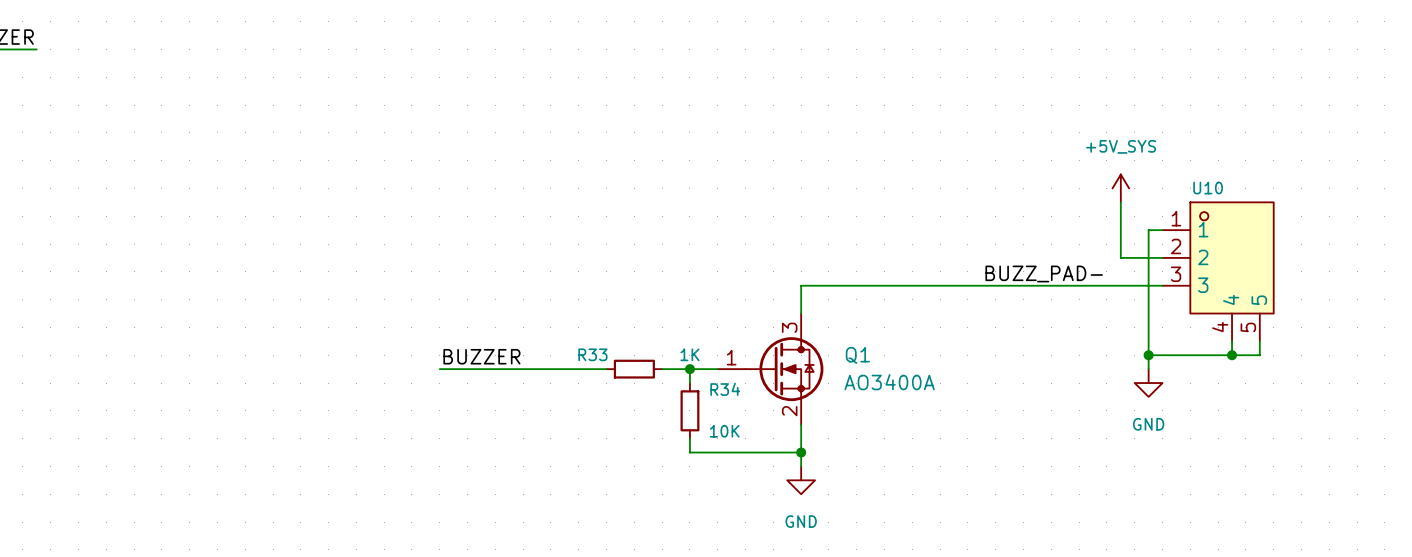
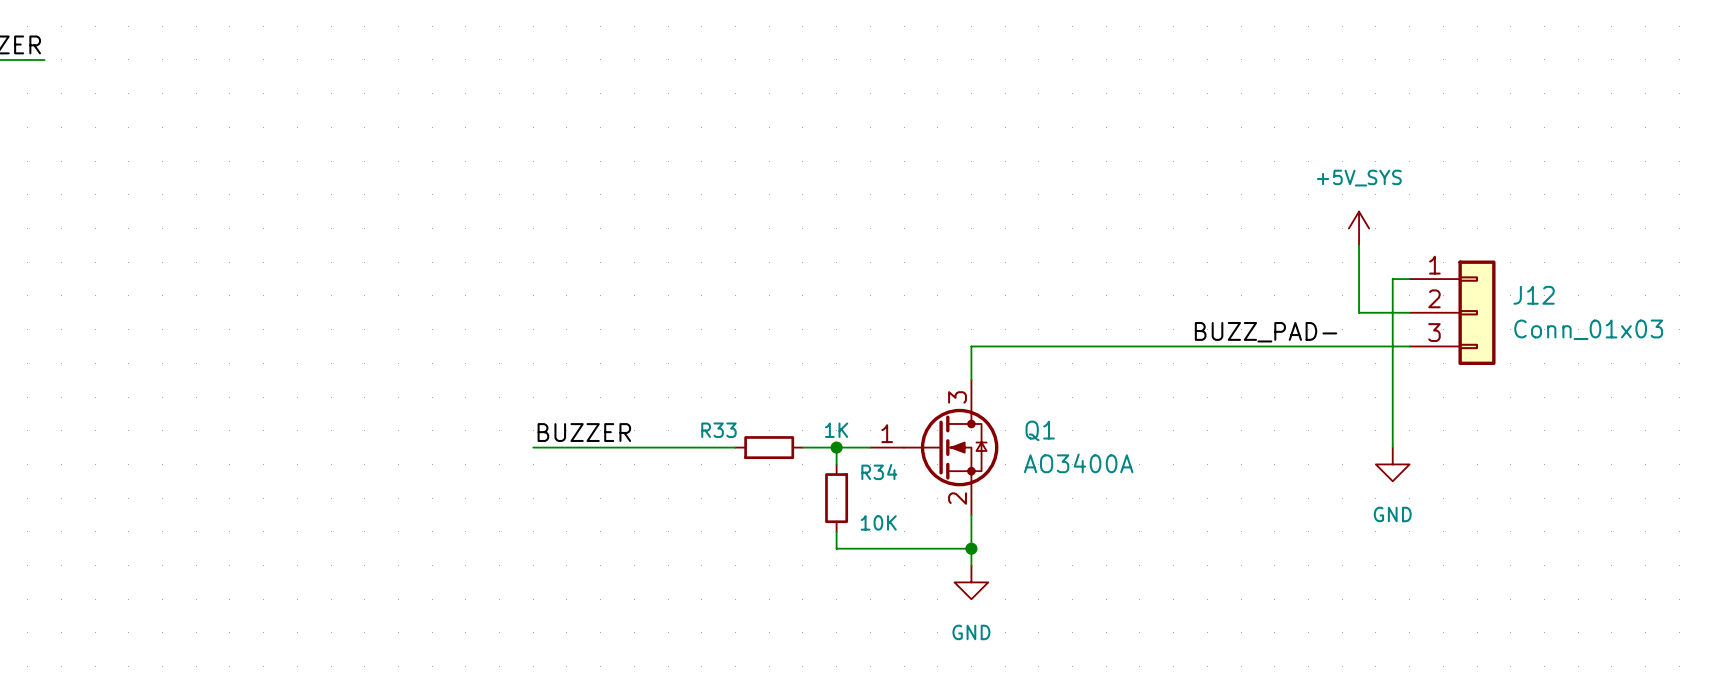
J12: none -> Conn_01x03 (1452, 312)
U10: (1218, 271) -> none
wire: (1232, 341) (1232, 355) -> none
wire: (1259, 341) (1259, 355) (1148, 355) -> none
junction: (1148, 355) -> none
junction: (1232, 355) -> none

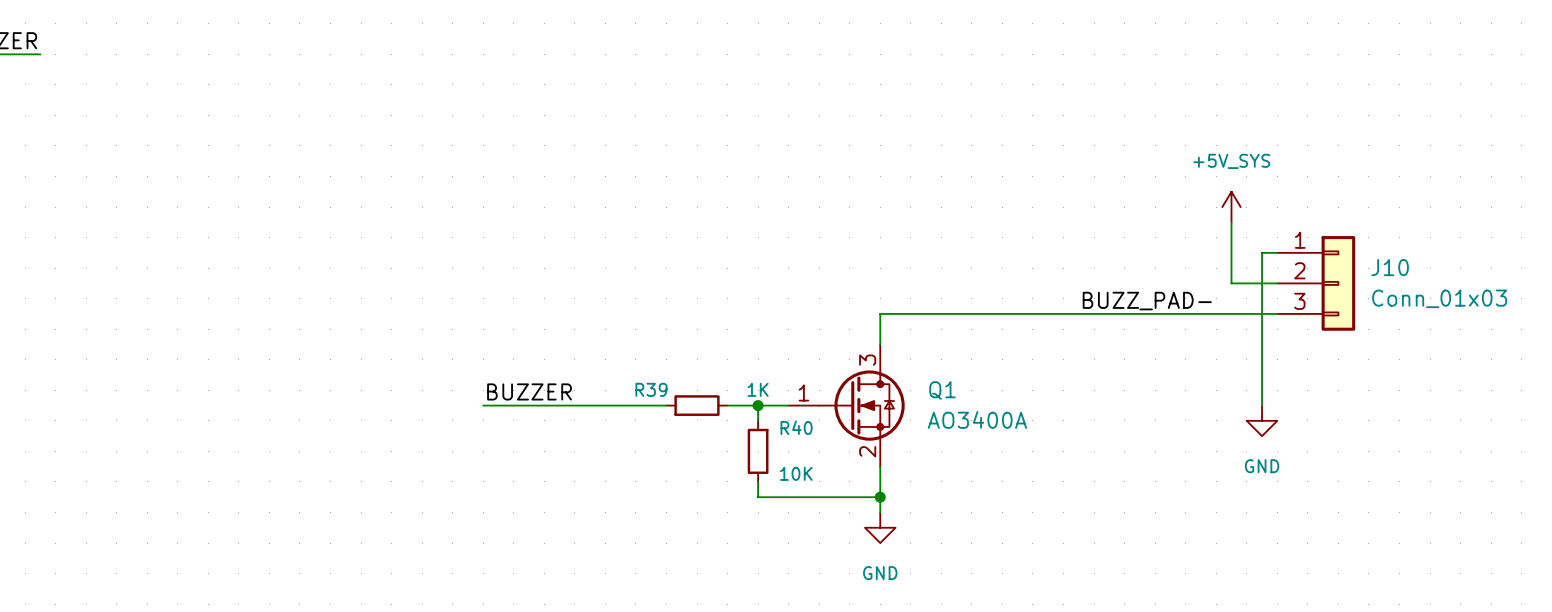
J12 name: J12 (1534, 295) -> J10 (1390, 267)
R33 name: R33 (718, 430) -> R39 (651, 389)
R34 name: R34 (879, 472) -> R40 (796, 427)

